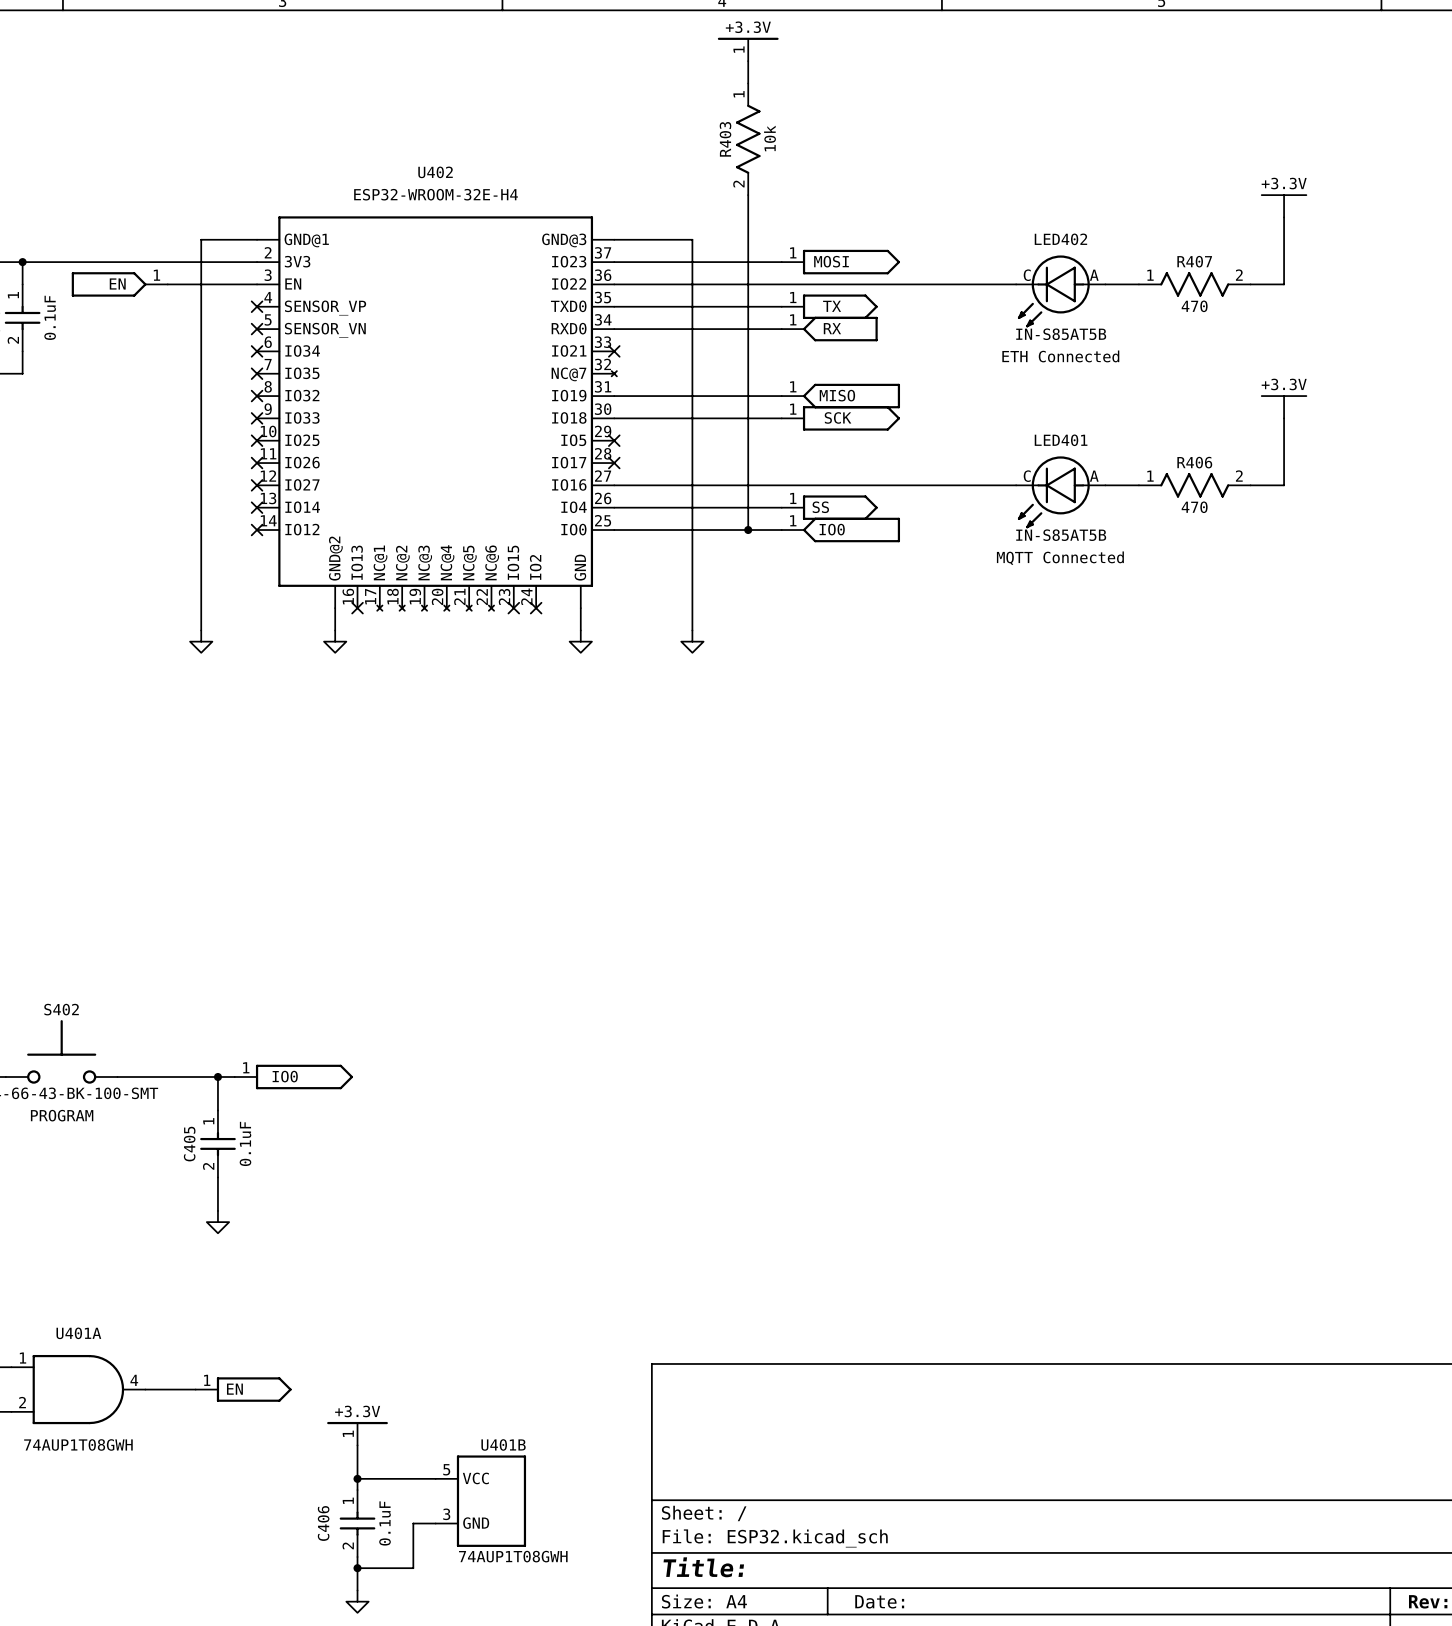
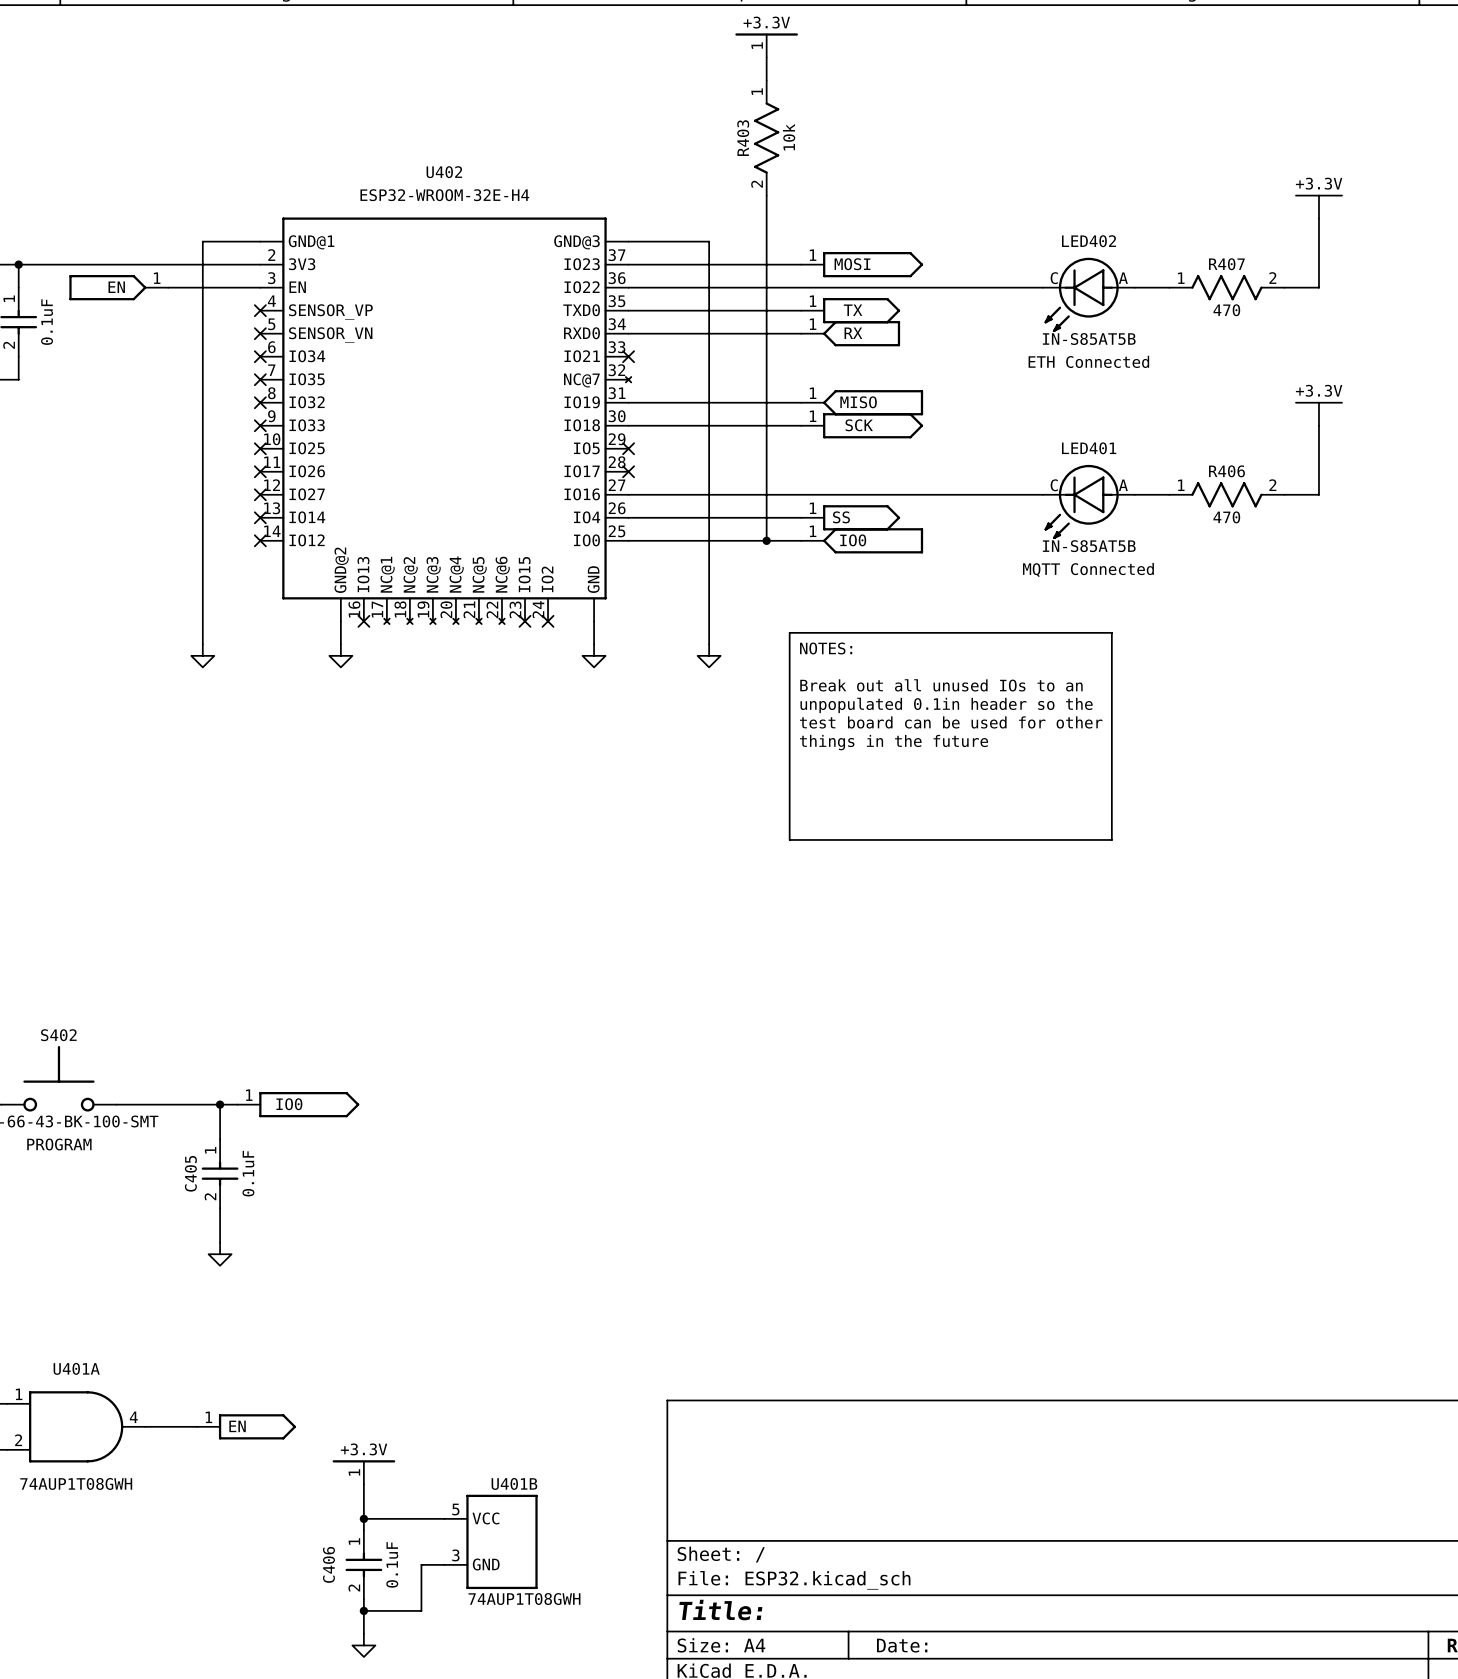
line: none -> (789, 632) (1111, 632) (1111, 839) (789, 839) (789, 632)
text: none -> NOTES: (826, 648)
text: none -> Break out all unused IOs to an (941, 685)
text: none -> unpopulated 0.1in header so the (946, 705)
text: none -> test board can be used for other (951, 722)
text: none -> things in the future (894, 742)

